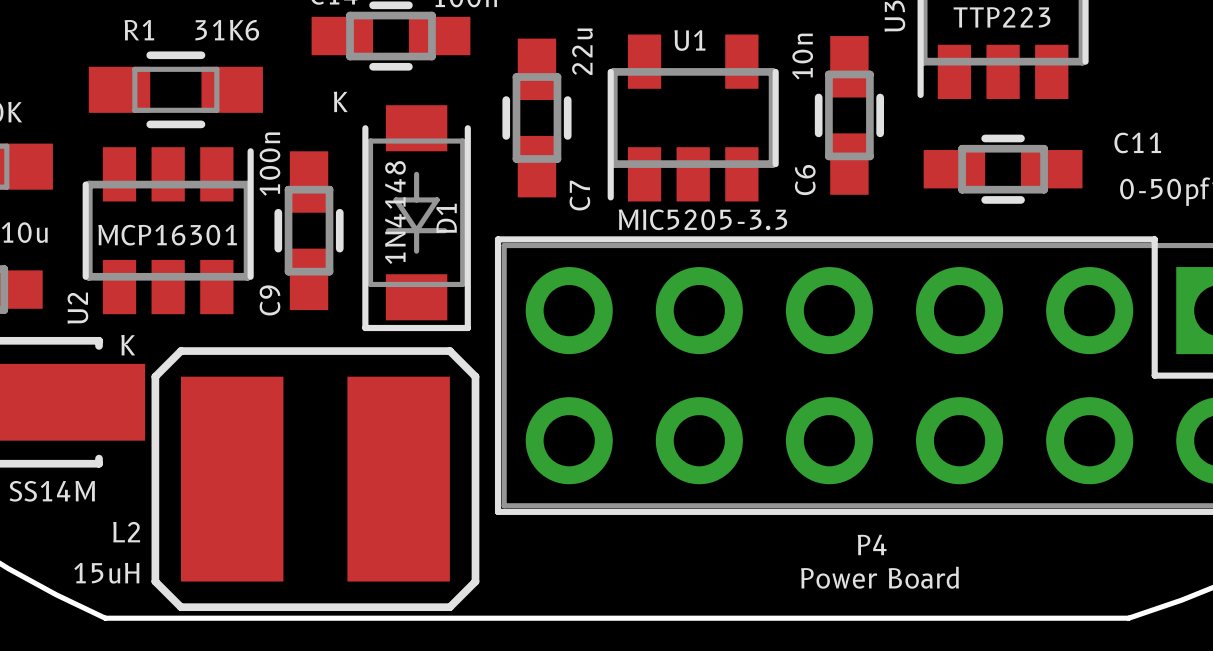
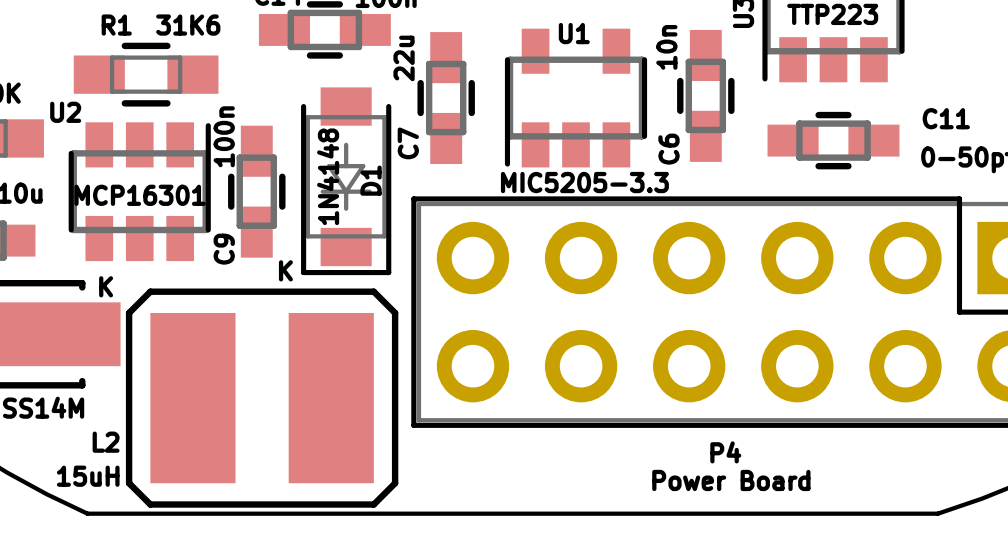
C7 value position: 22u (582, 51) -> 22u (404, 58)
text position: K (340, 101) -> K (285, 270)
C7 name position: C7 (579, 195) -> C7 (408, 143)
U2 name rotation: 0° (77, 308) -> 90° clockwise (65, 112)
U2 name position: U2 (77, 308) -> U2 (65, 112)

